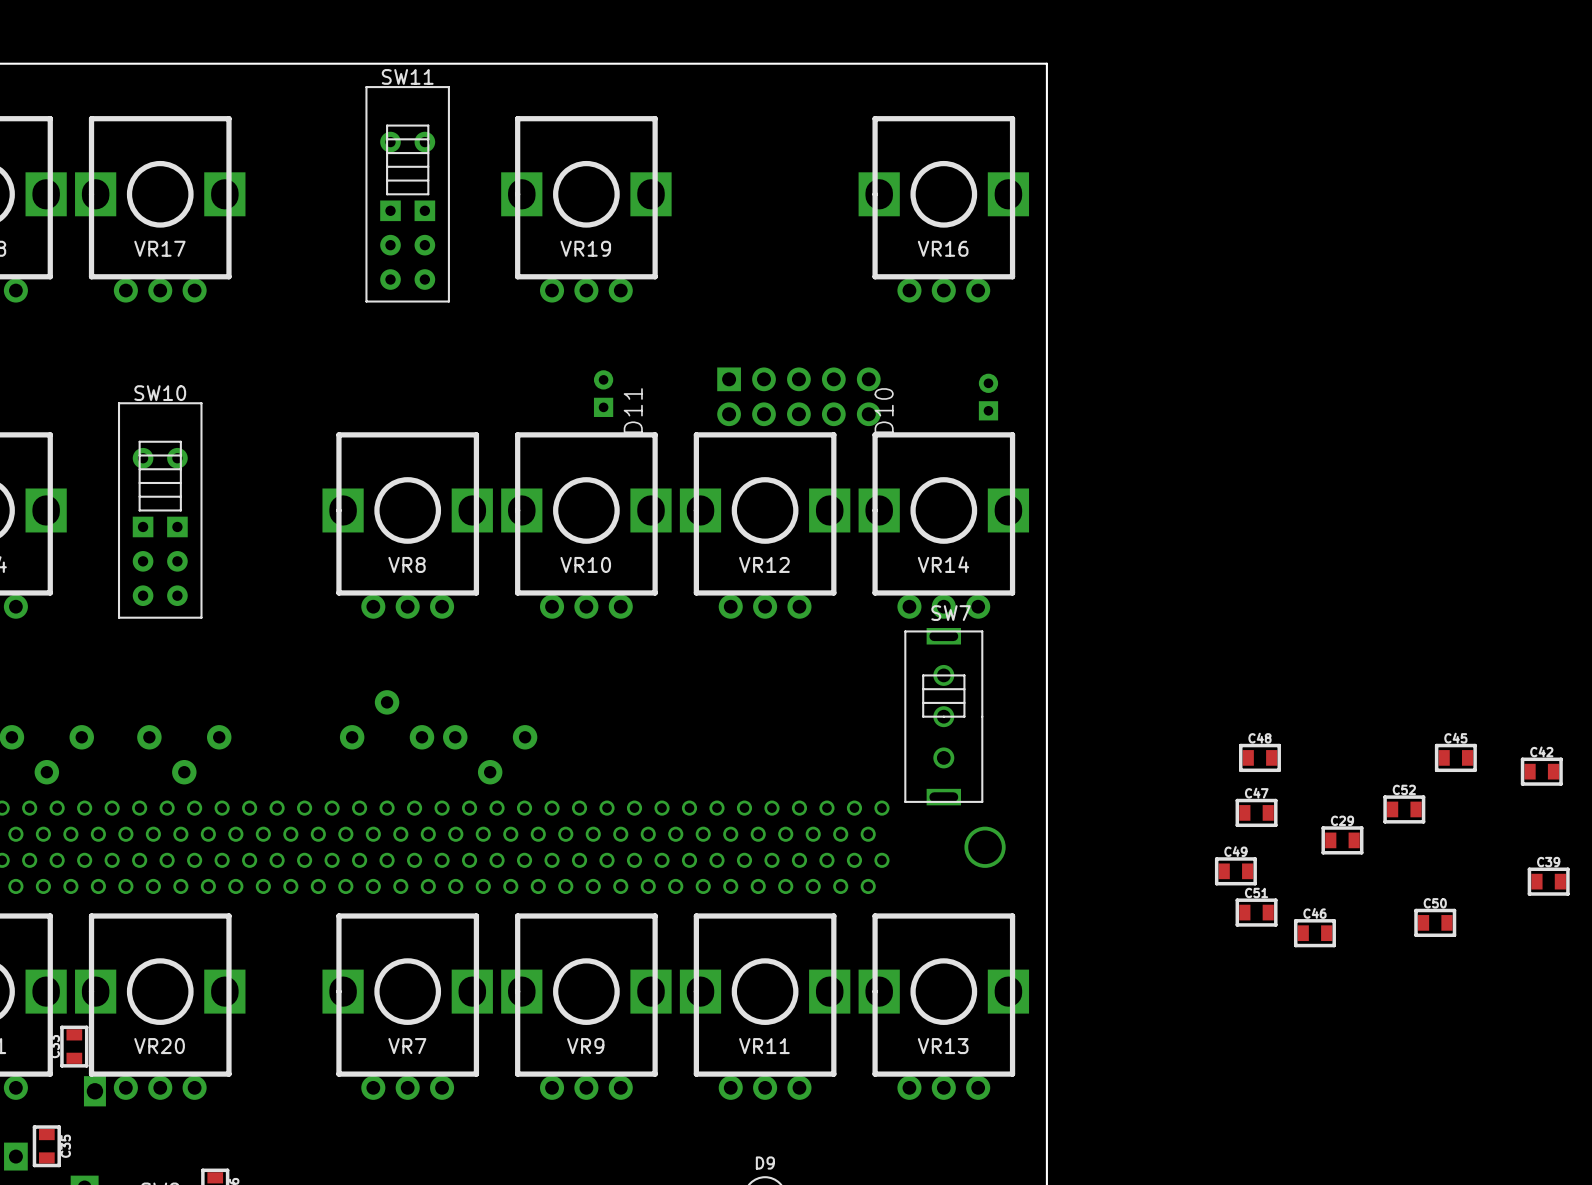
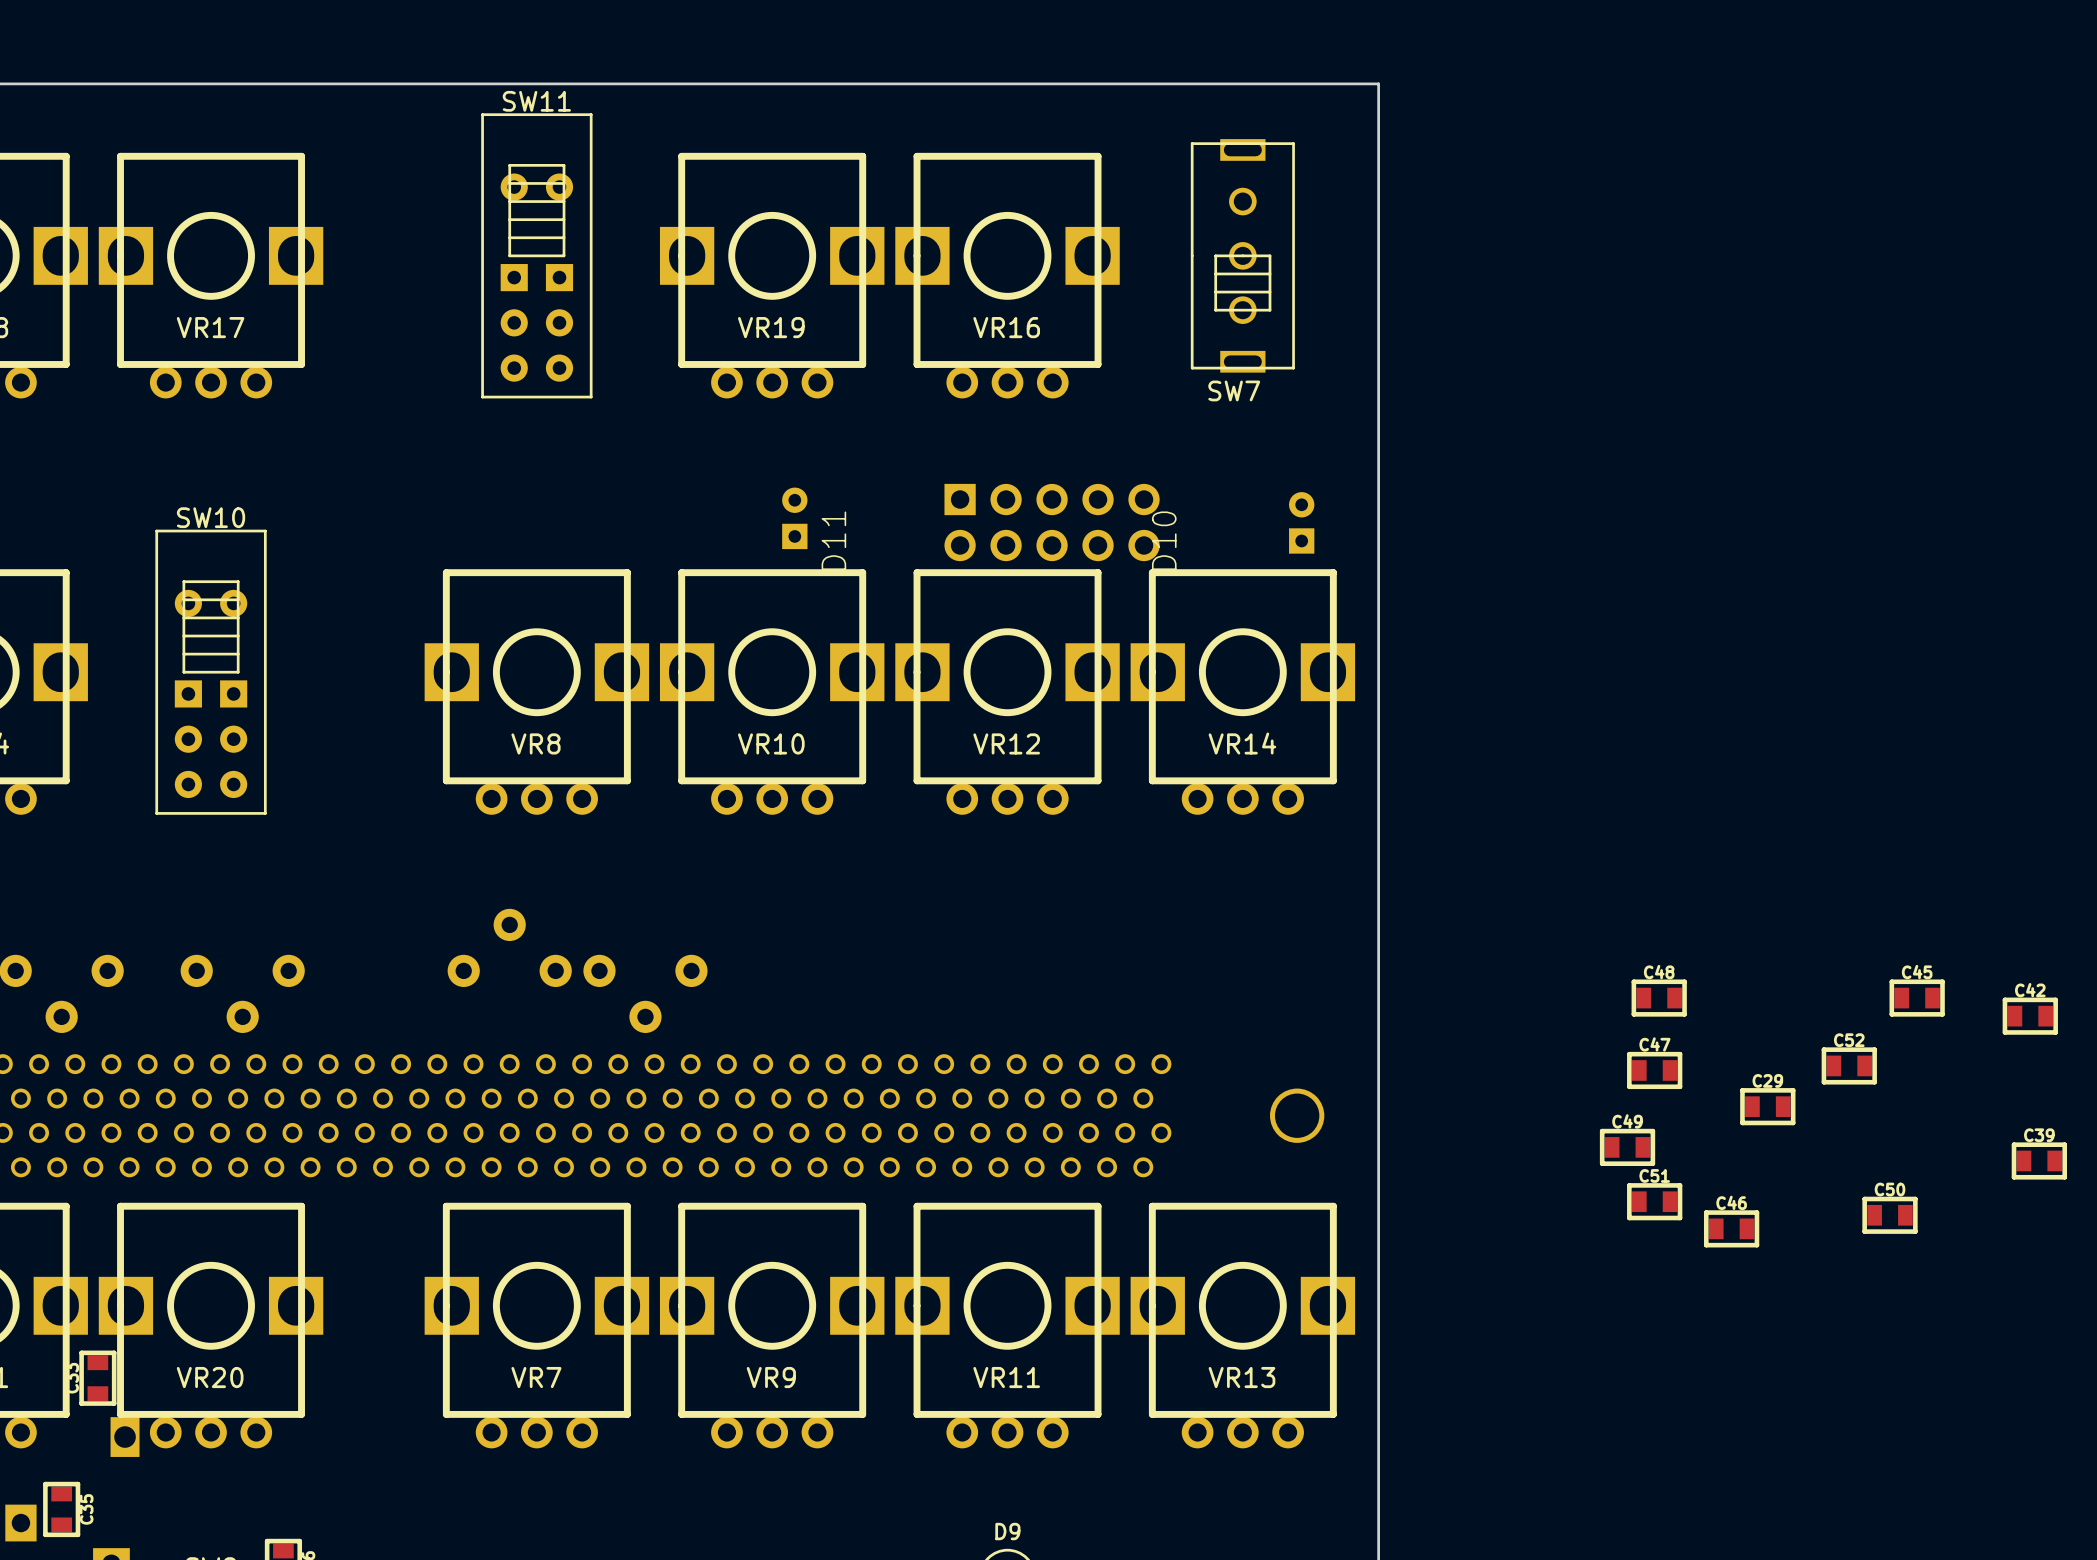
VR16 position: (943, 209) -> (1007, 275)
SW7 rotation: 0° (943, 716) -> 180° (1242, 255)
SW7 position: (943, 716) -> (1242, 255)

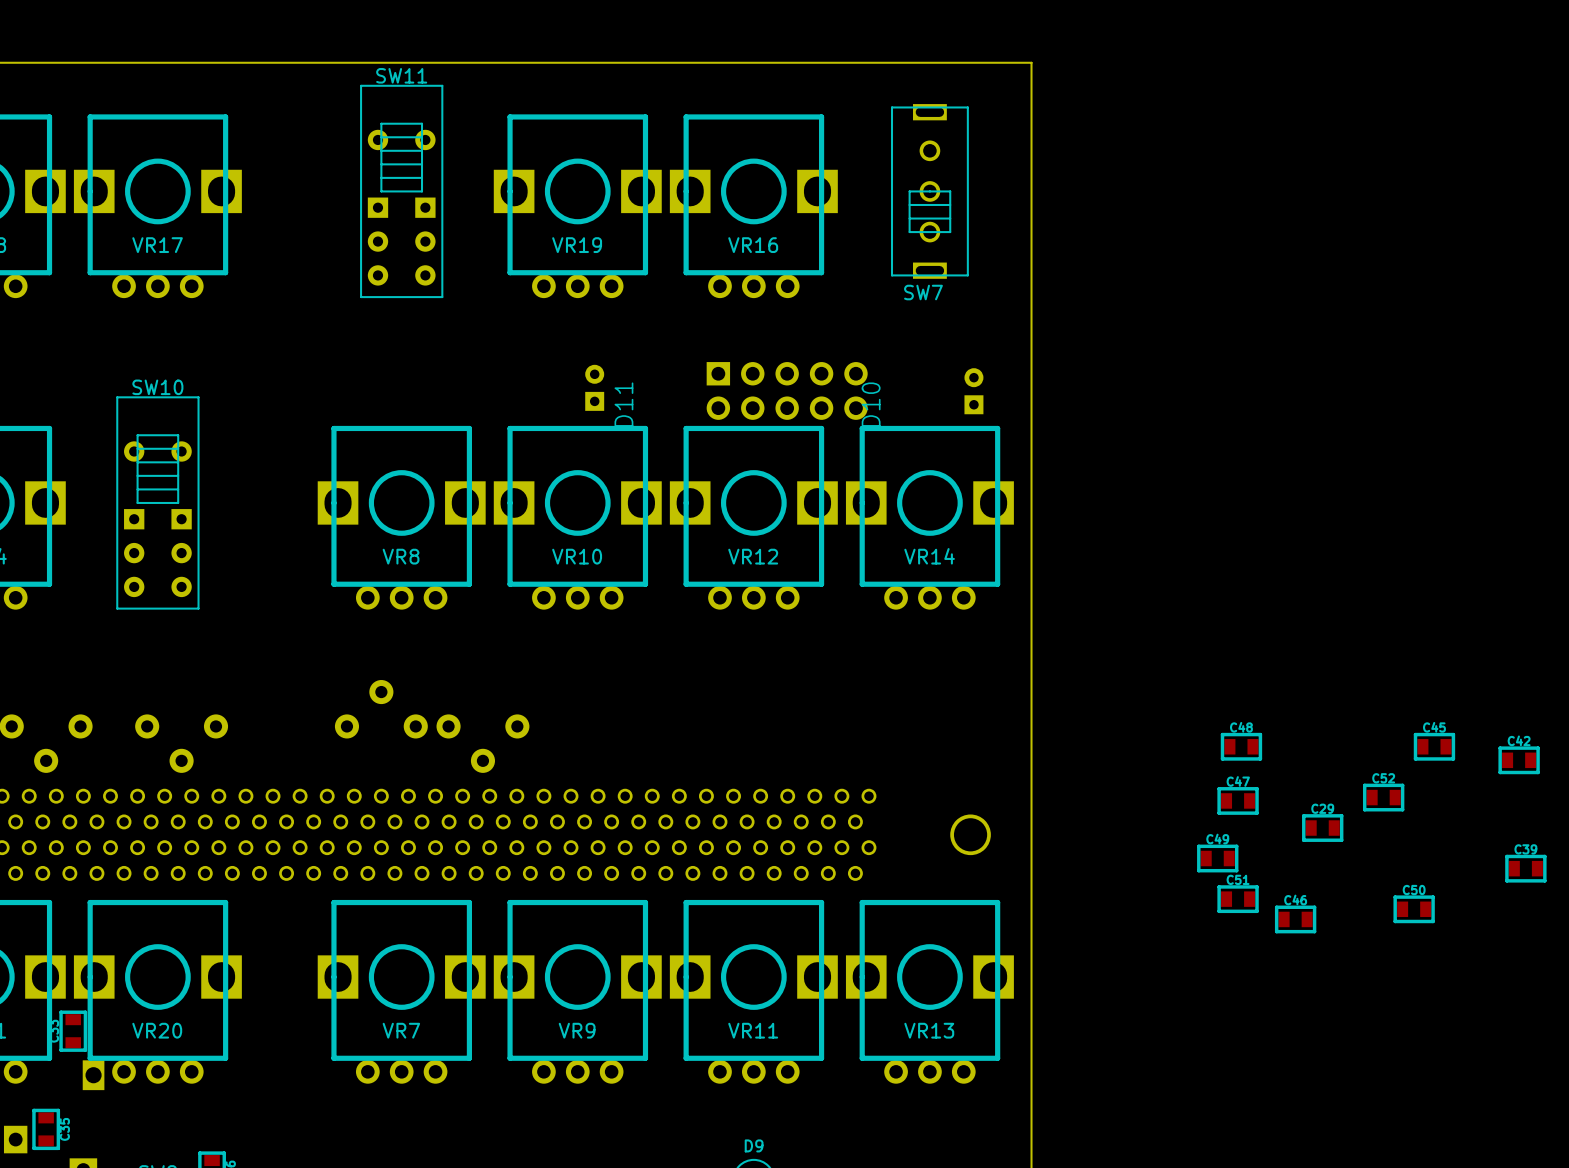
SW11 footprint: [481, 113, 593, 399] -> [360, 84, 444, 299]
SW10 footprint: [155, 529, 267, 815] -> [116, 396, 200, 610]

